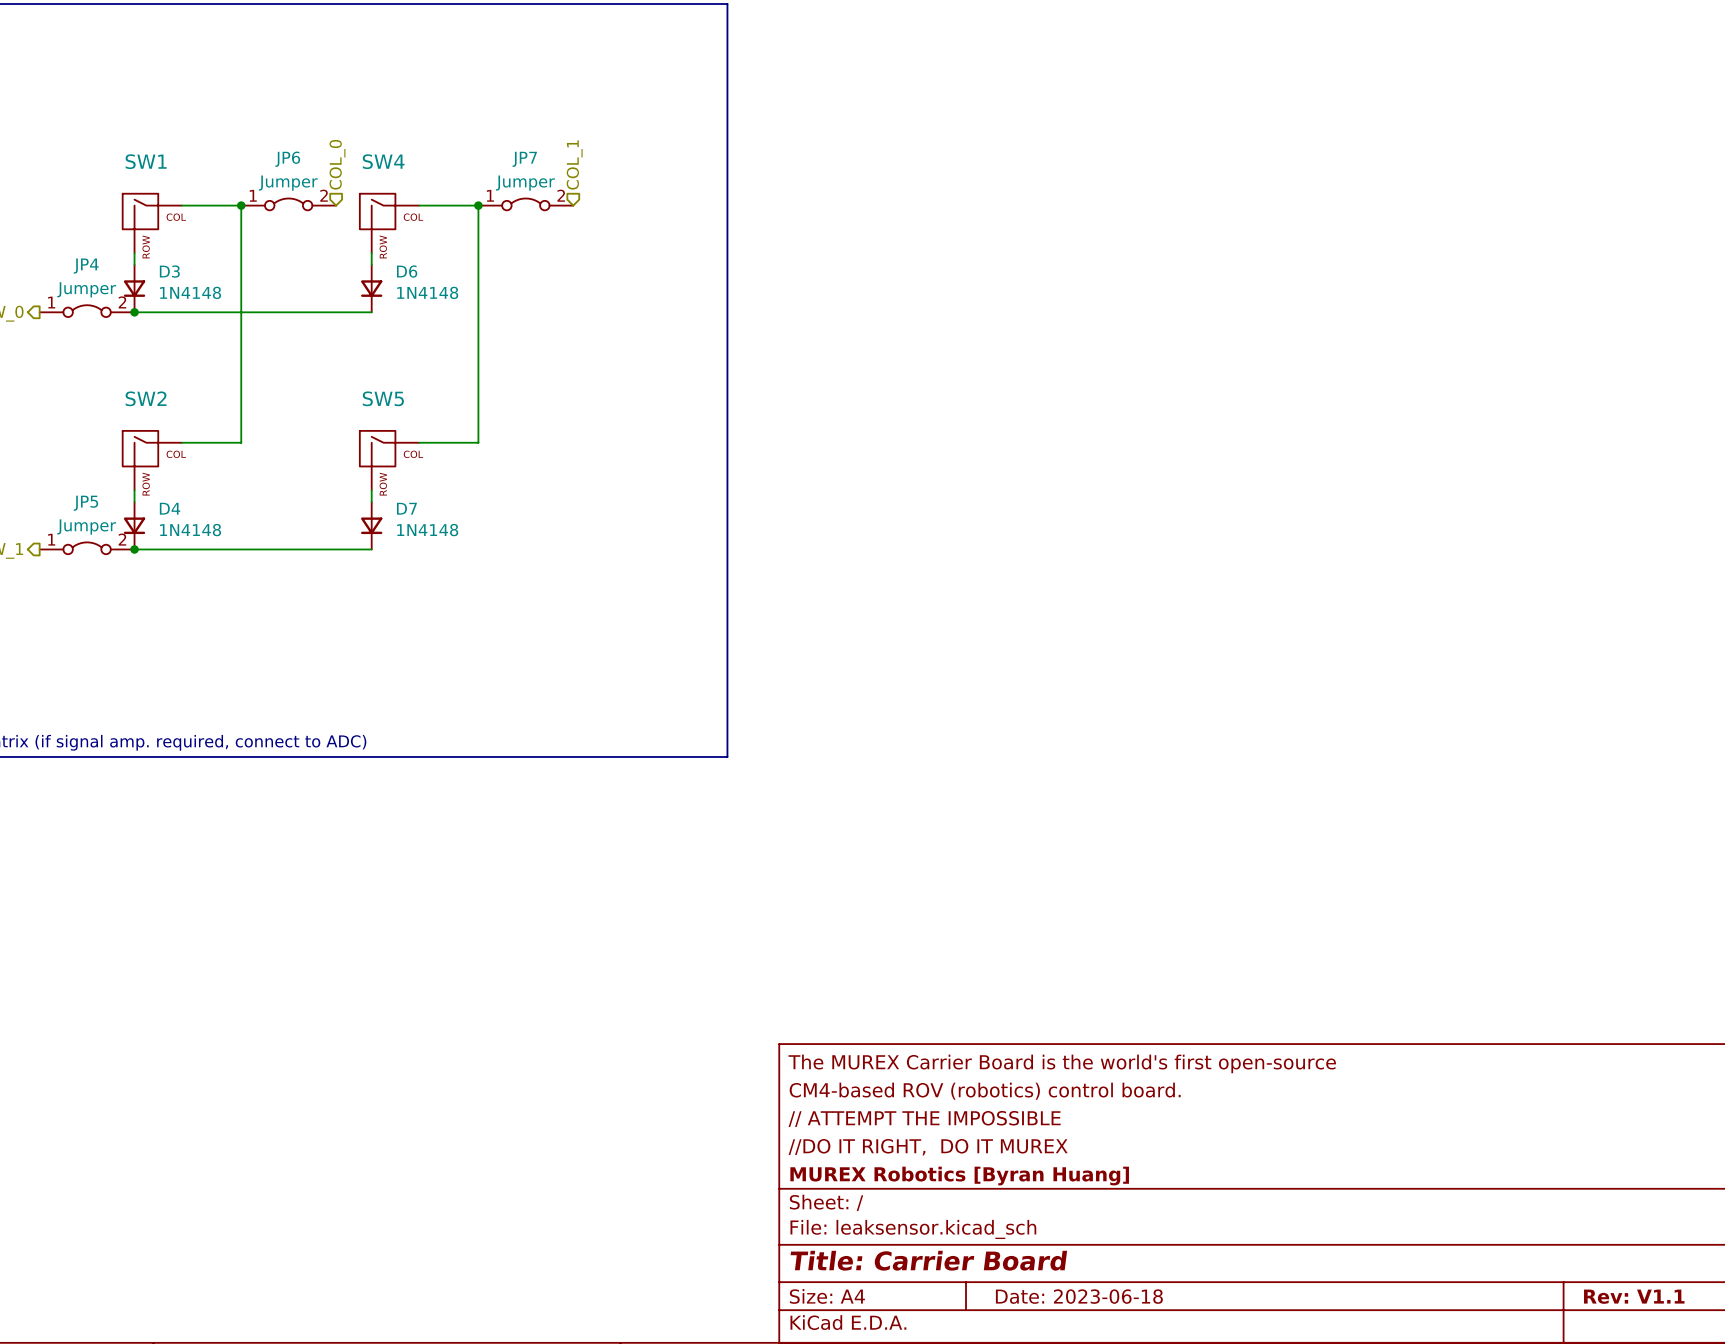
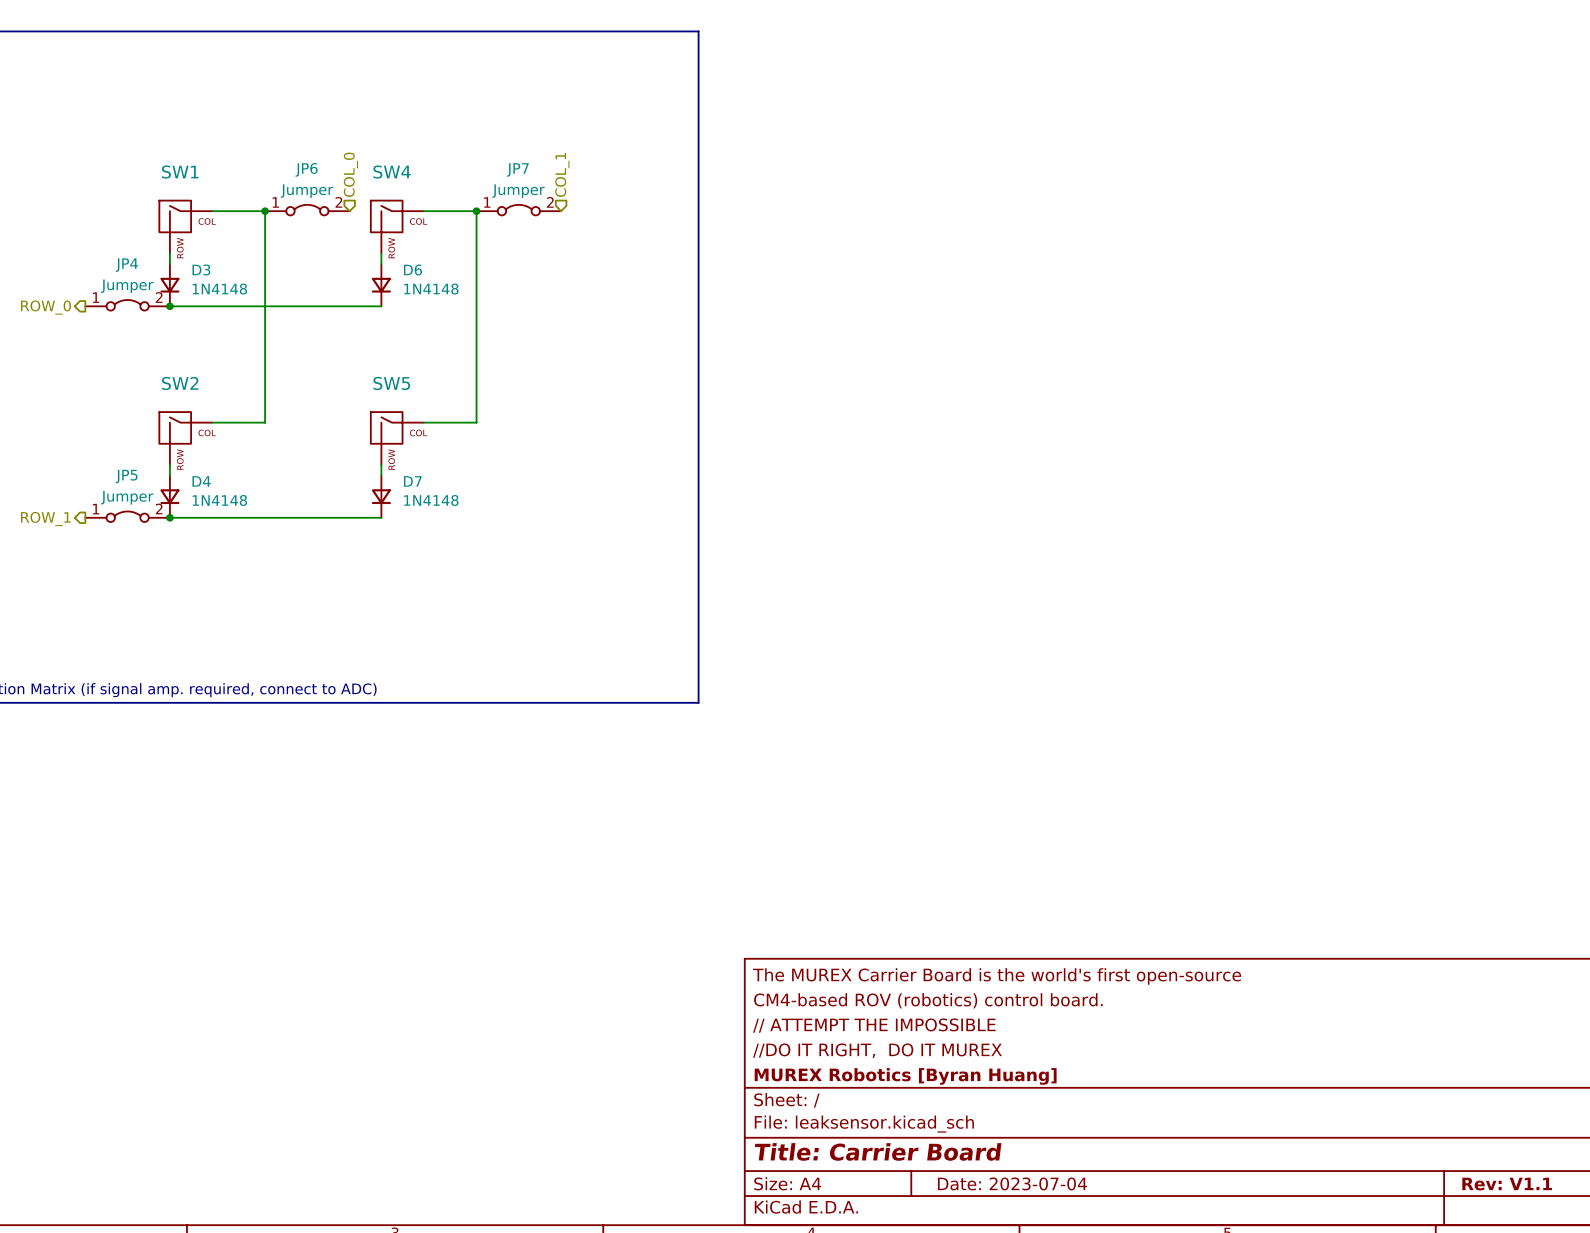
title block: Date: 2023-06-18 (1079, 1296) -> Date: 2023-07-04 (1012, 1183)

